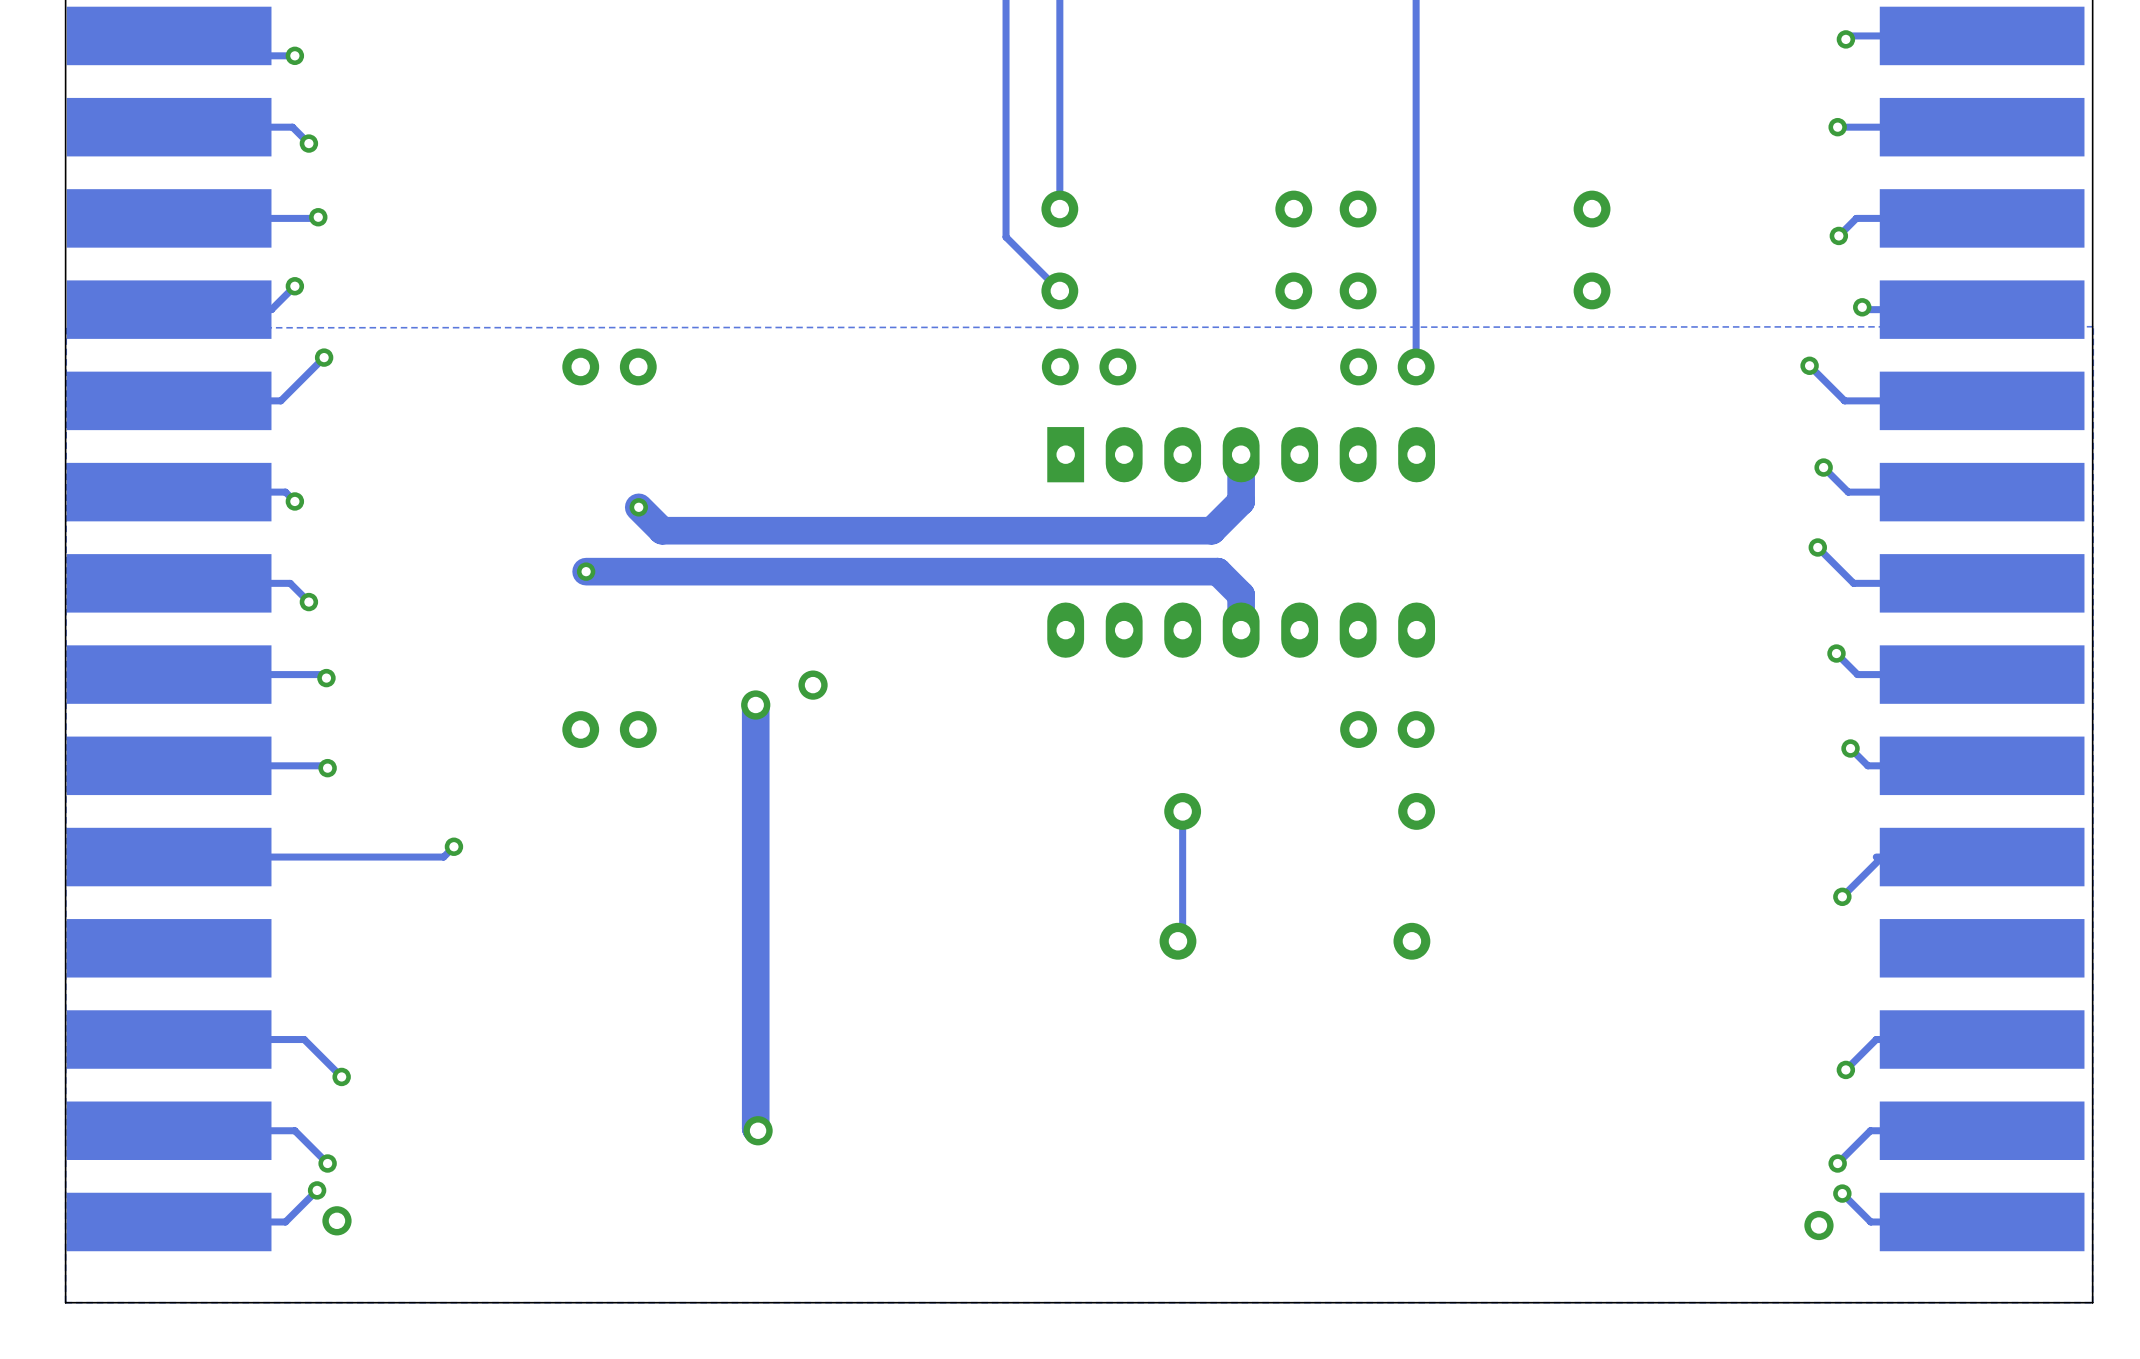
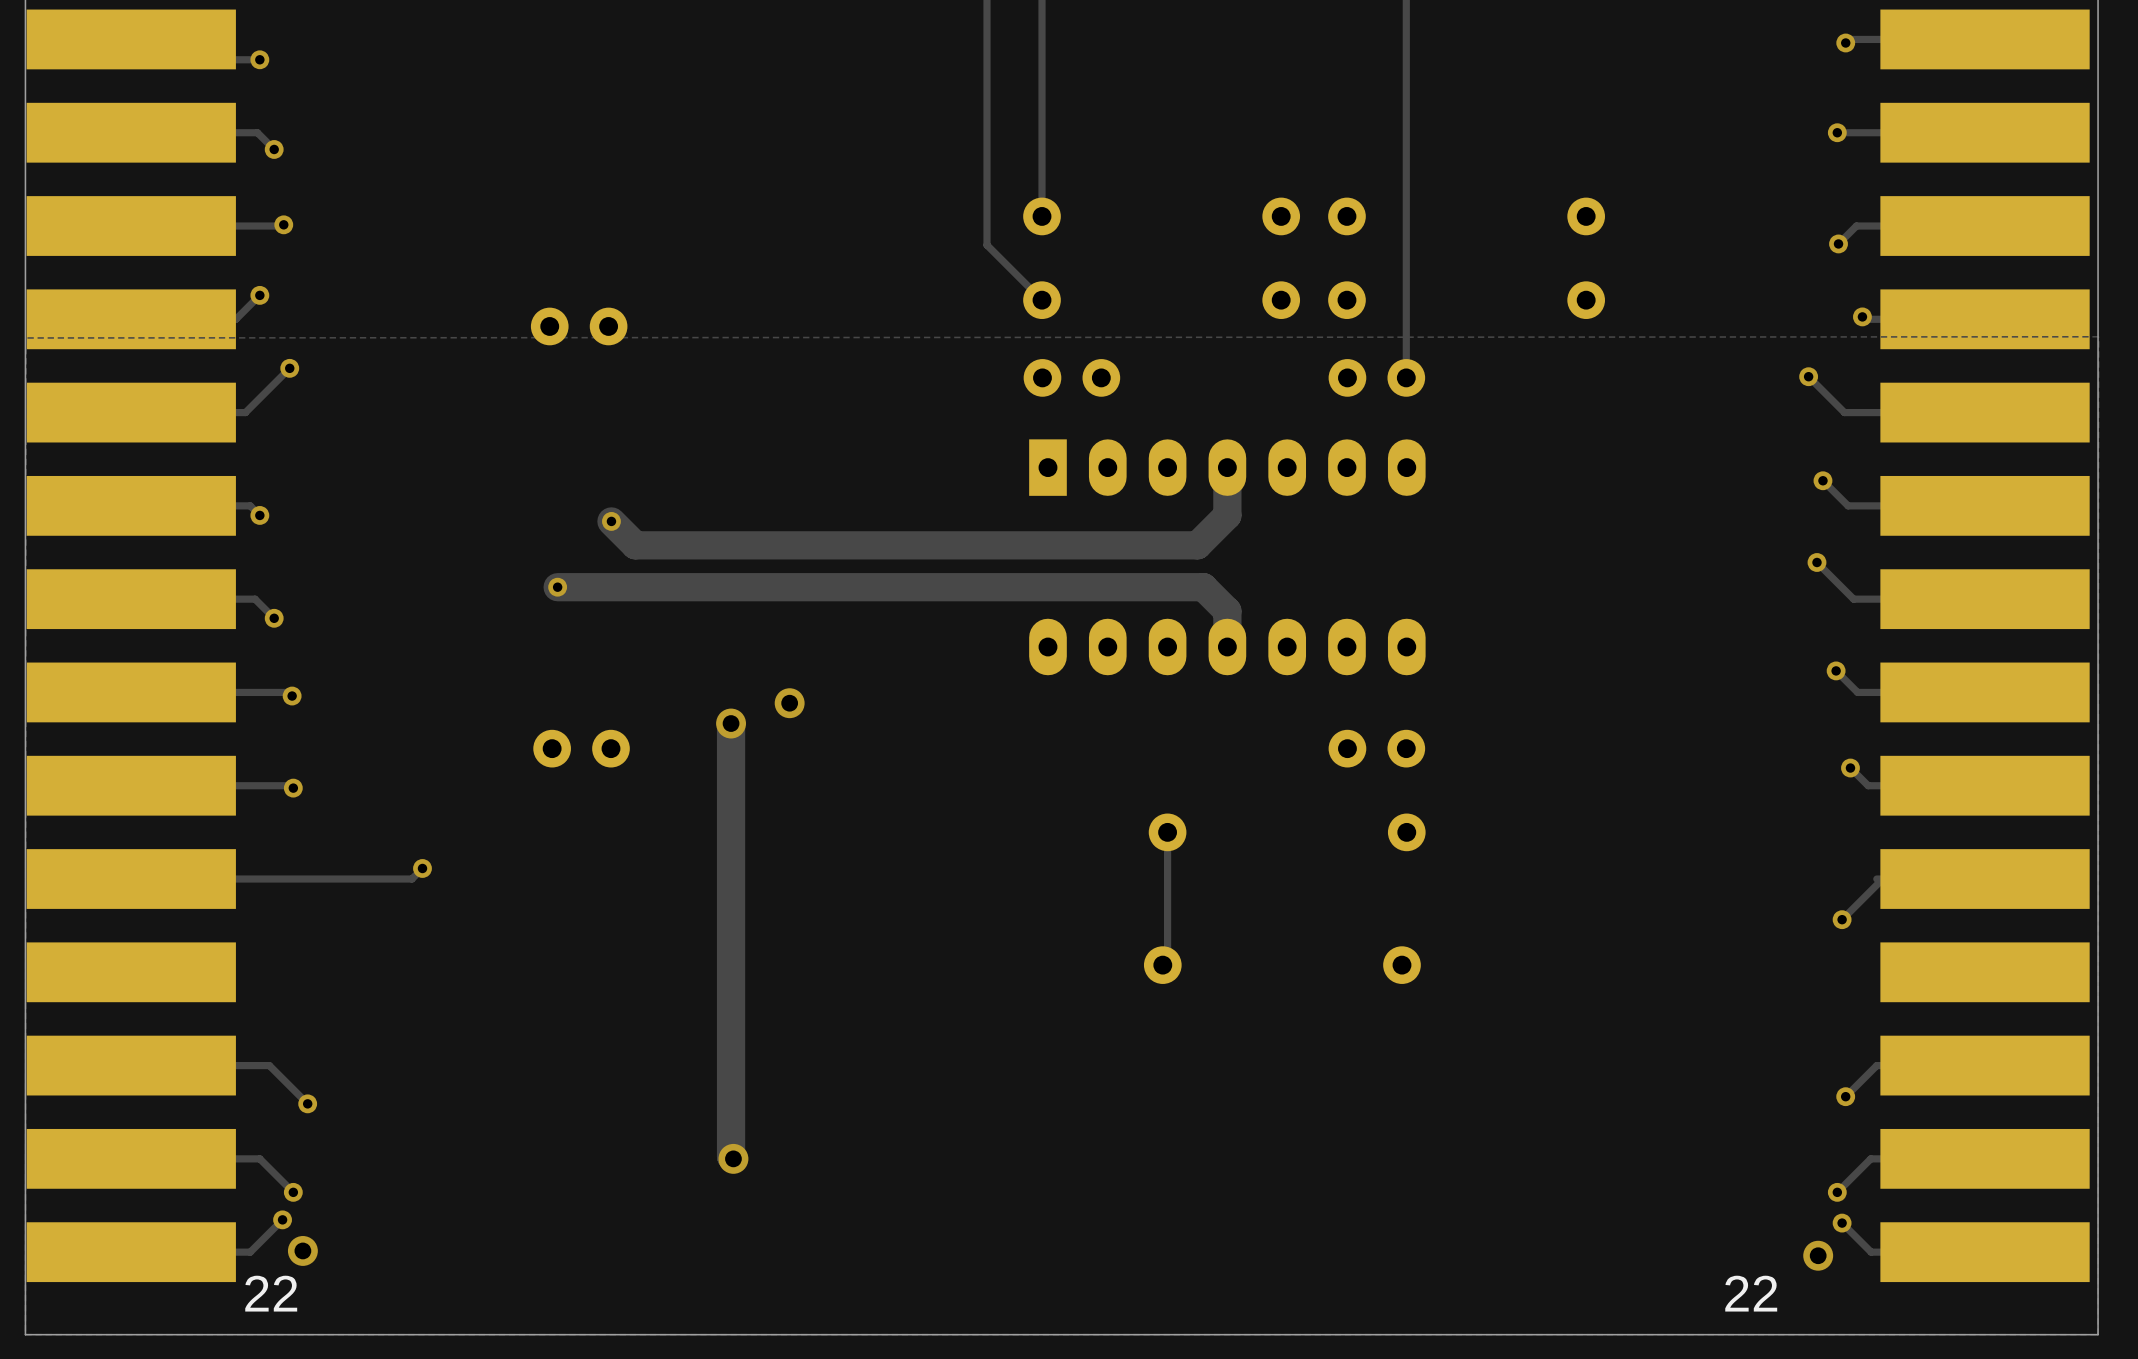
part position: (609, 366) -> (579, 326)
text: none -> 22 (271, 1293)
text: none -> 22 (1751, 1293)

